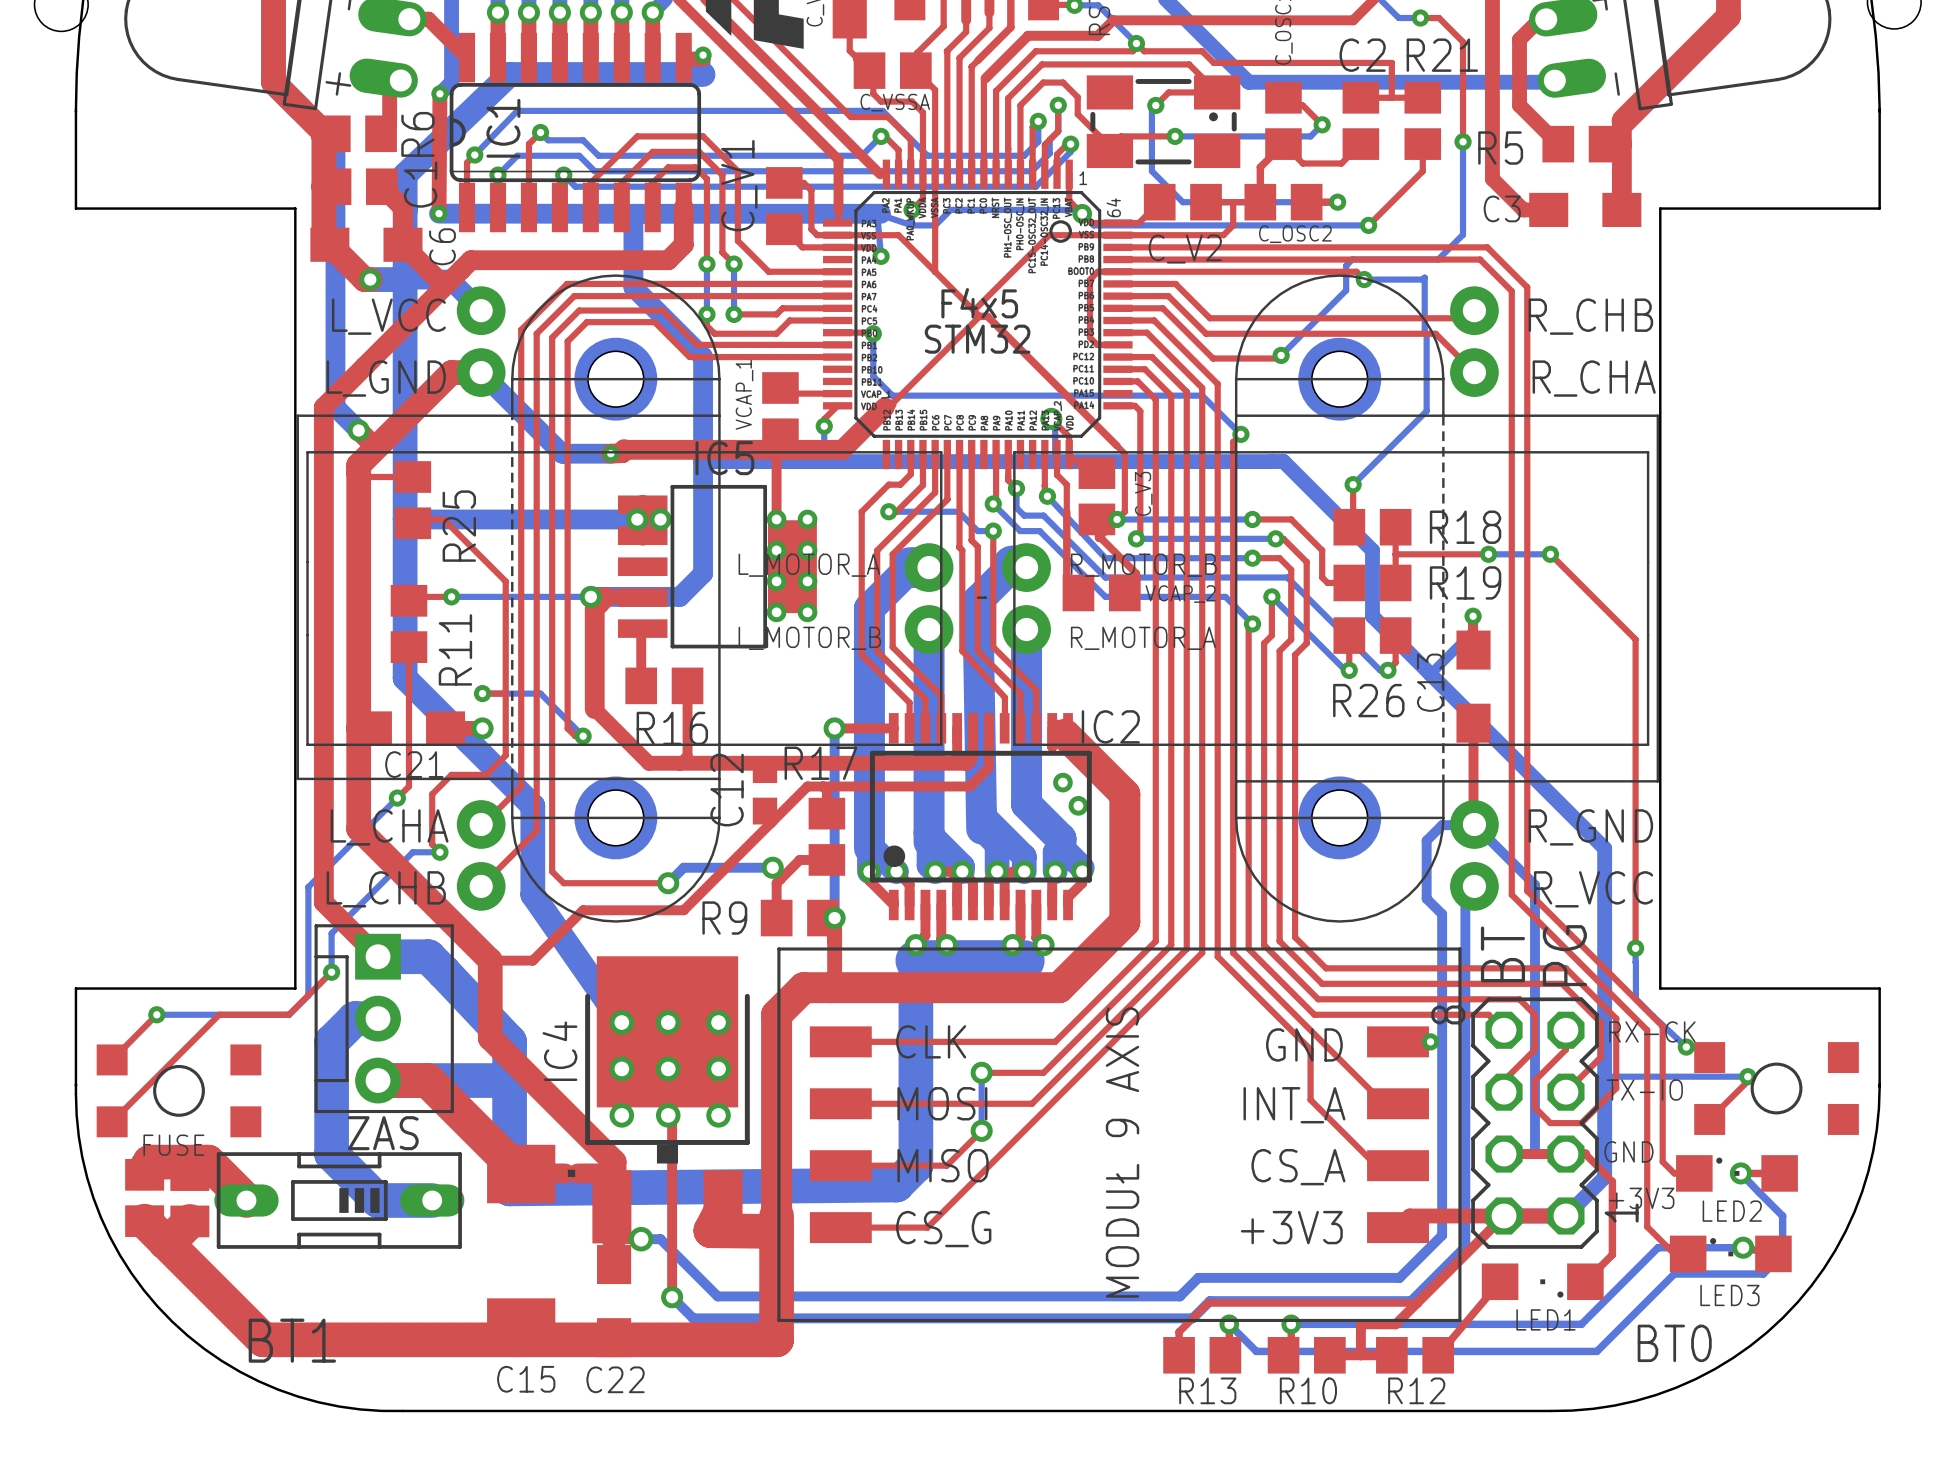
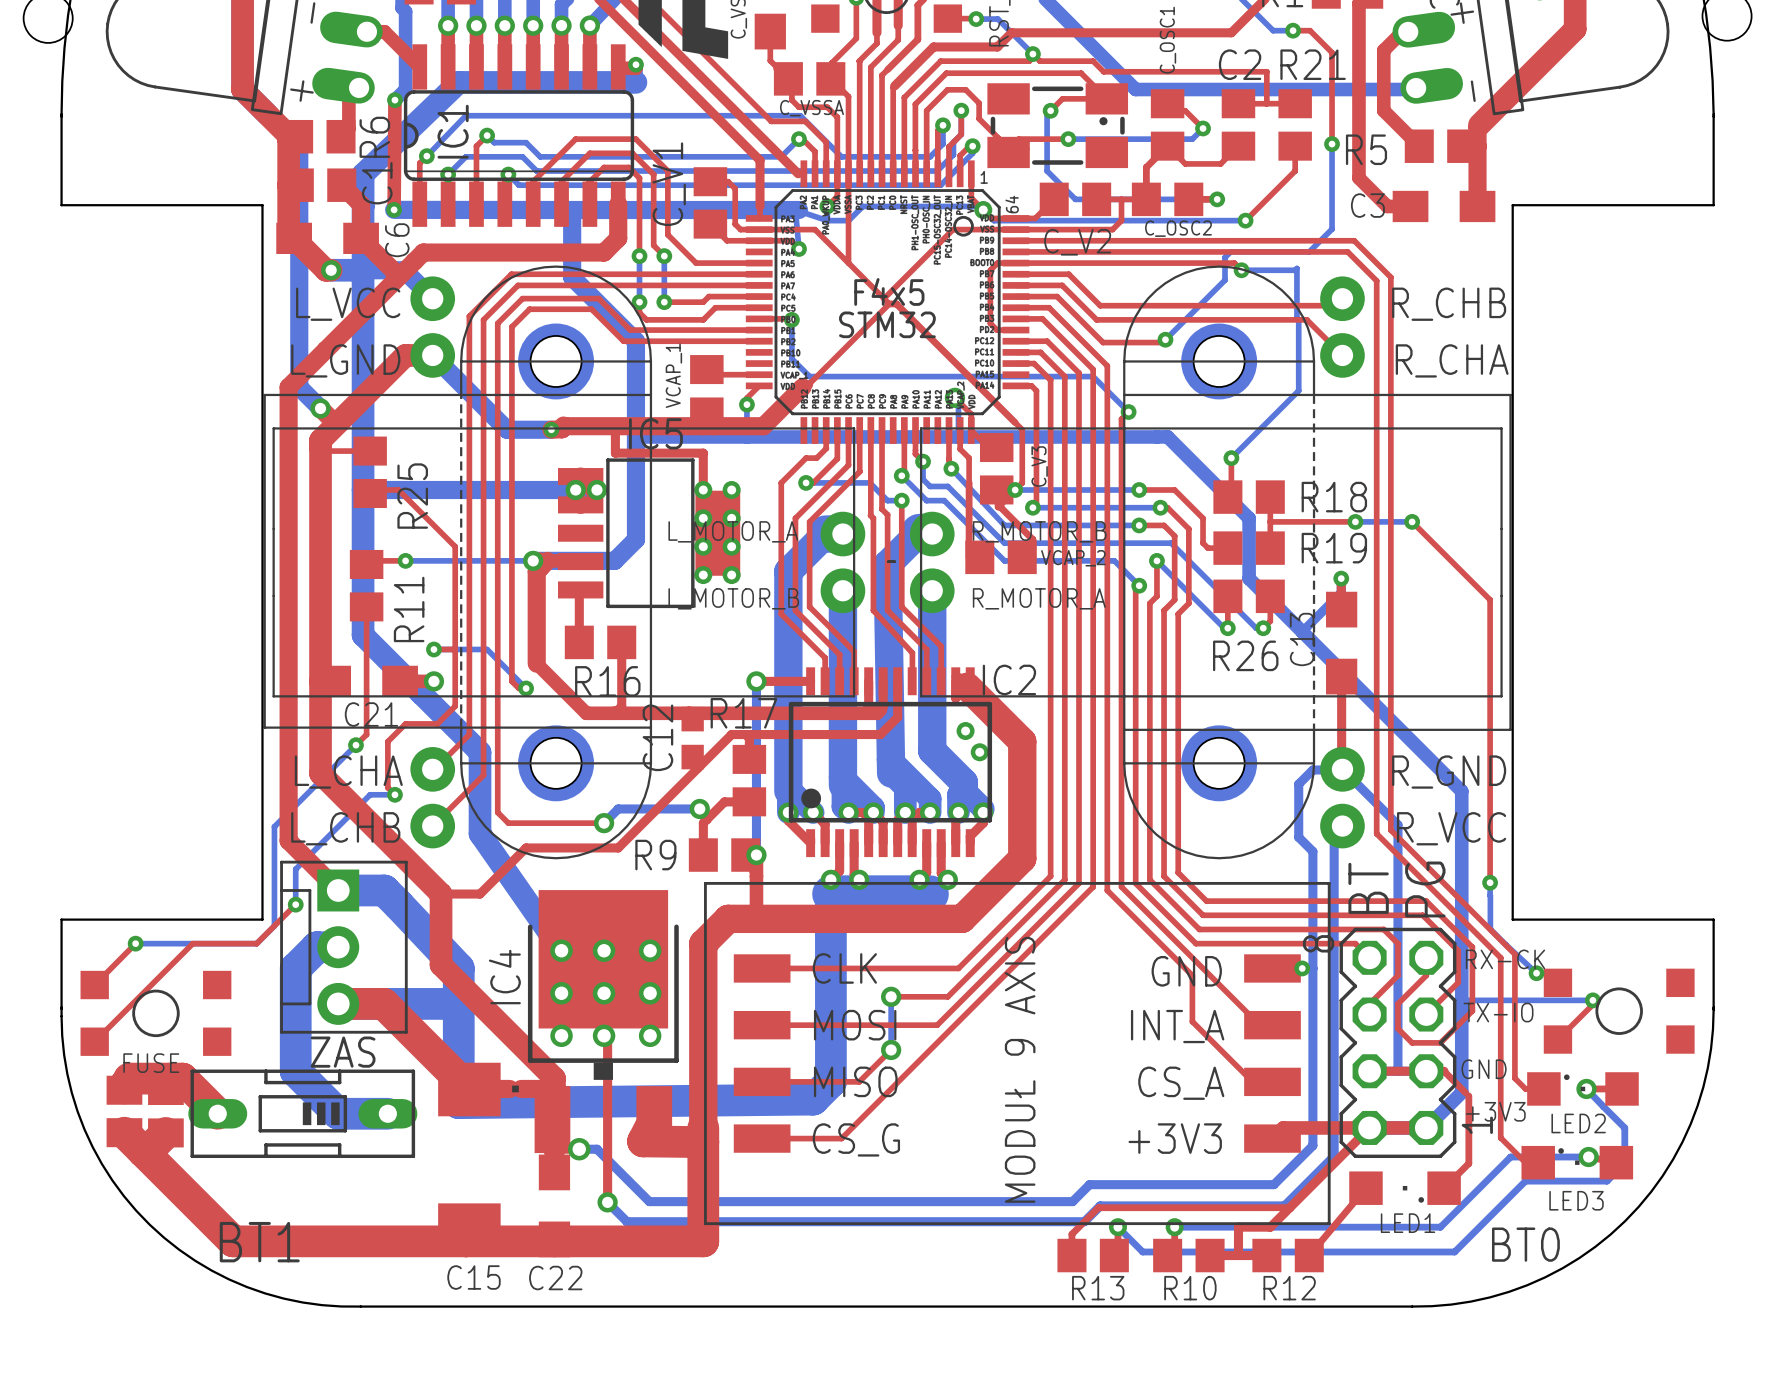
top track: (776, 449) (776, 479) -> (706, 426) (604, 424) (604, 430) (615, 430) (615, 453) (703, 453)

